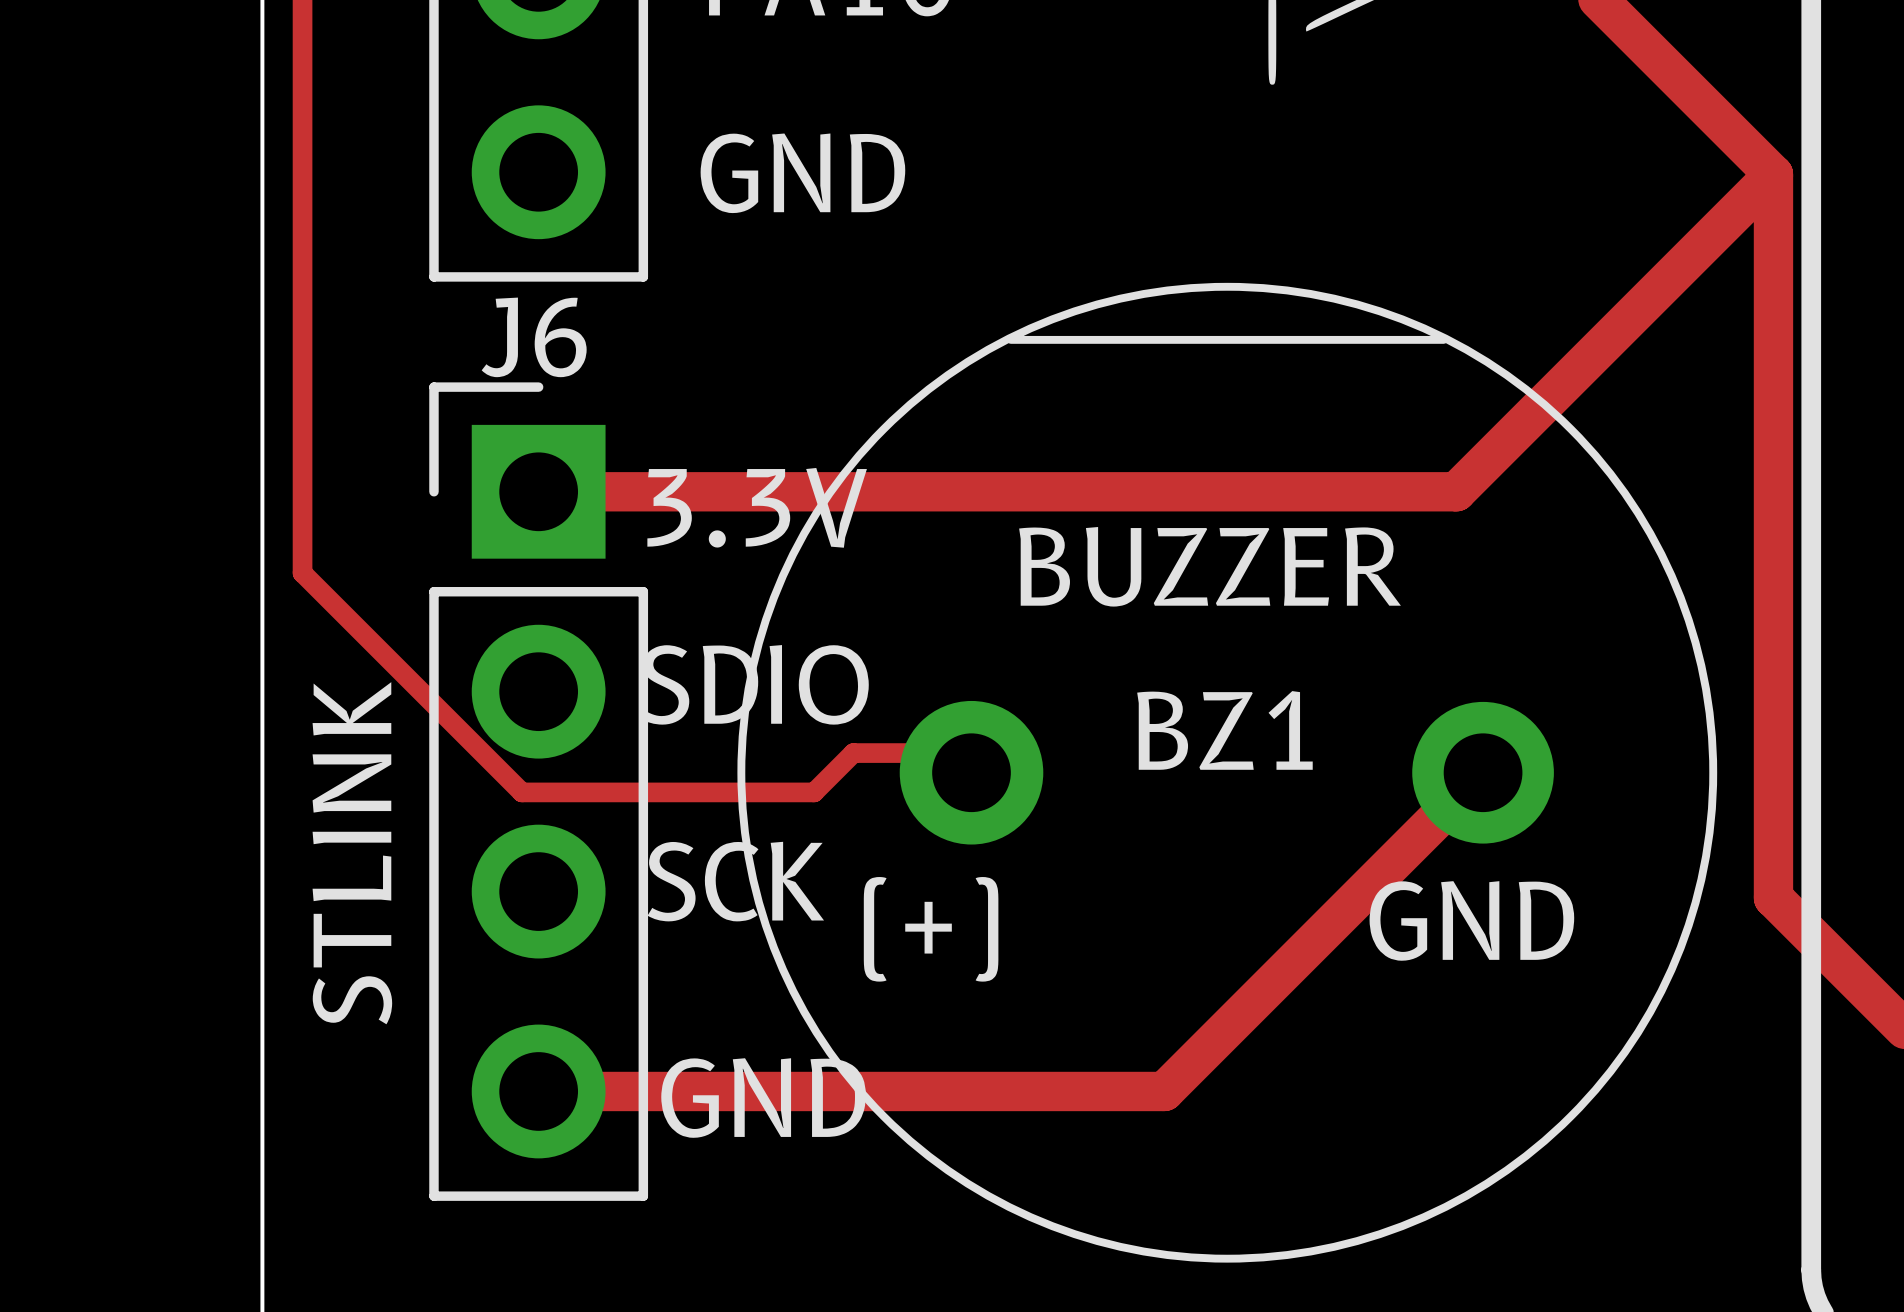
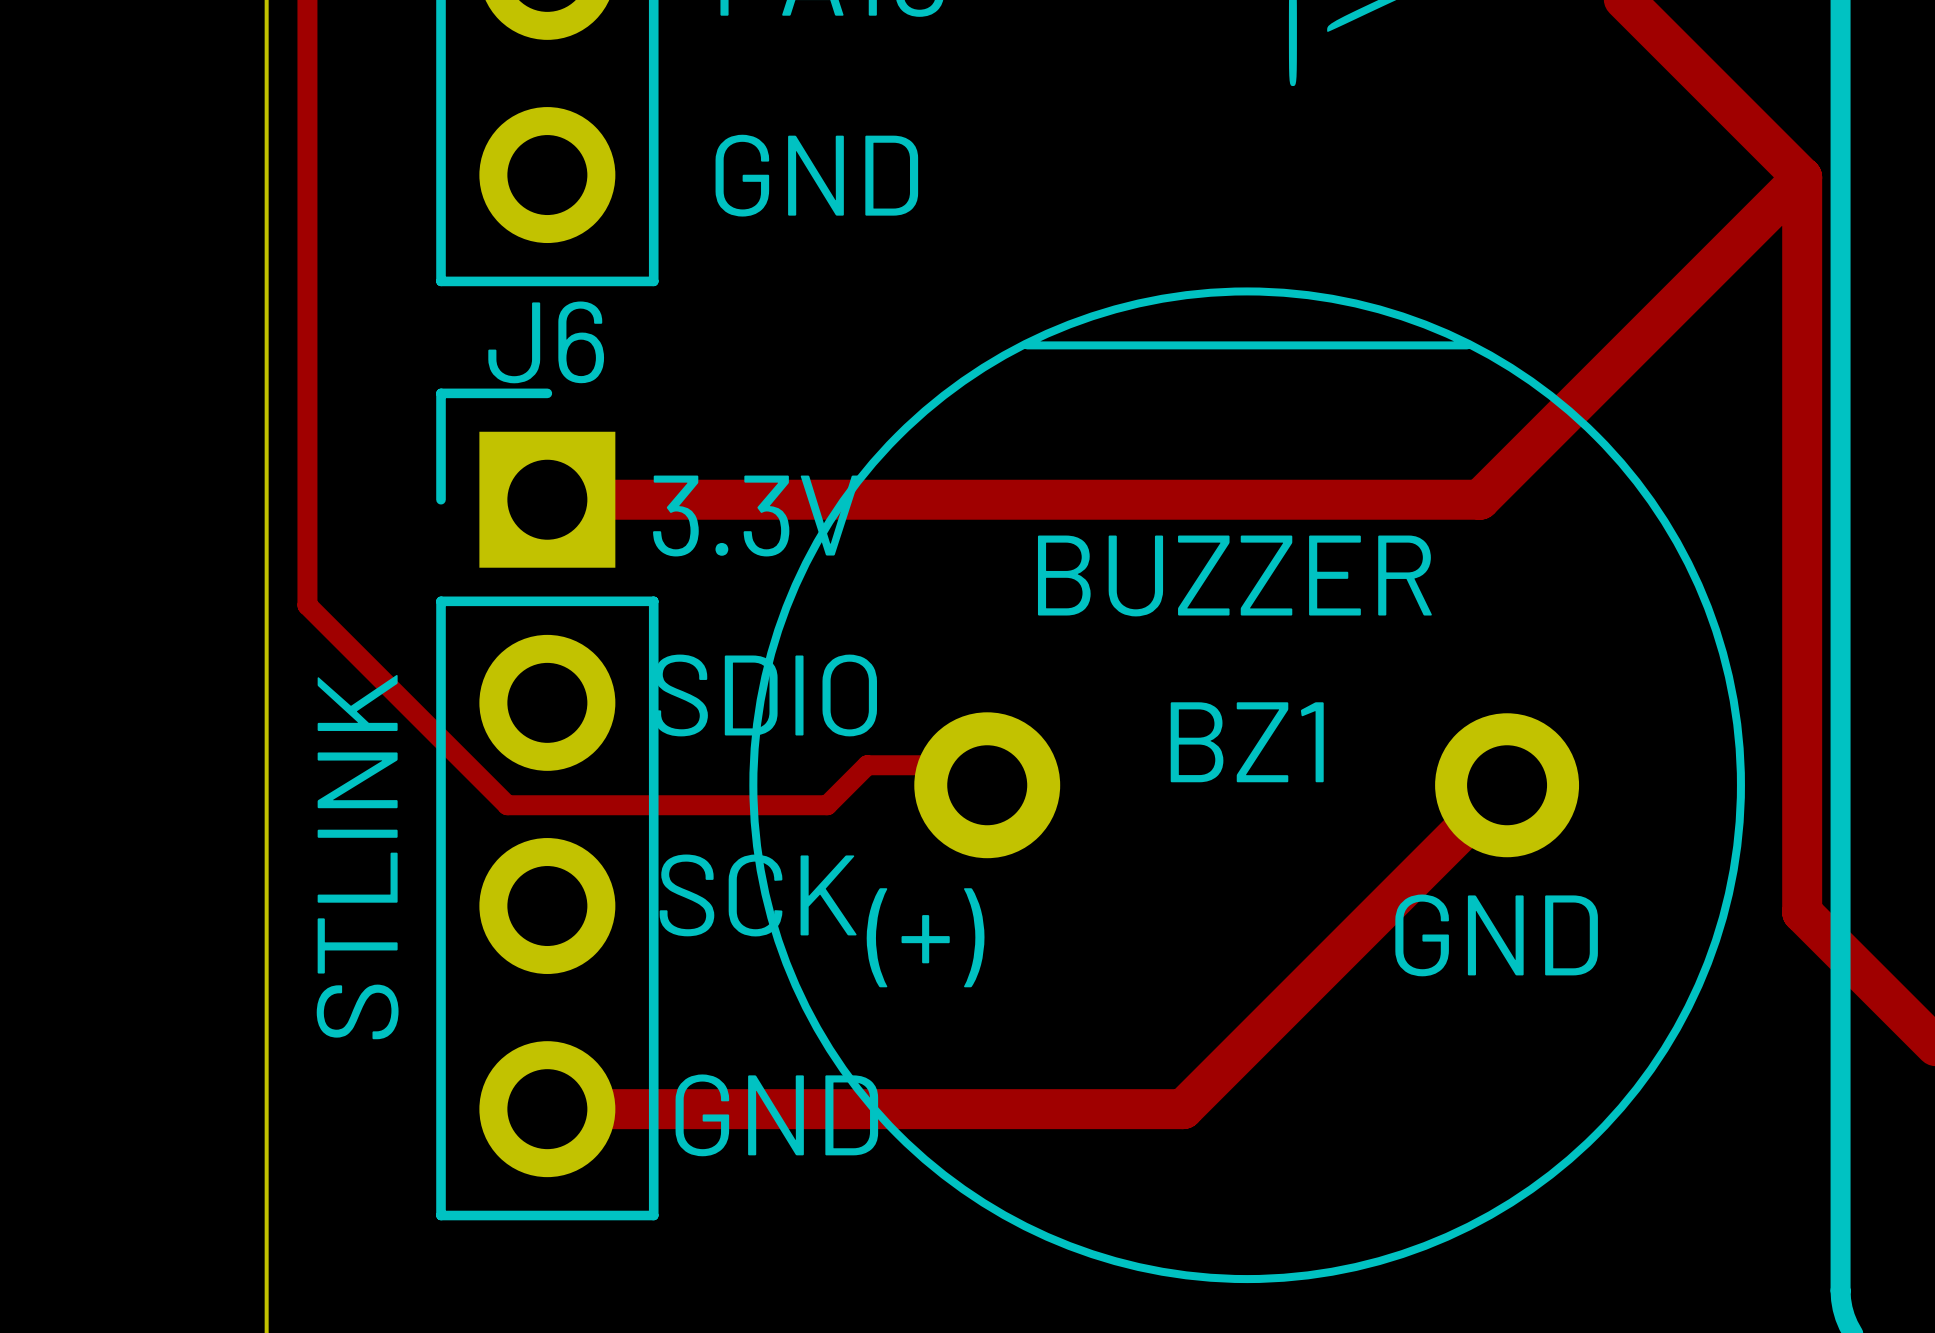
track: (302, 573) (521, 792) -> (307, 582) (307, 605) (507, 805) (530, 805)

